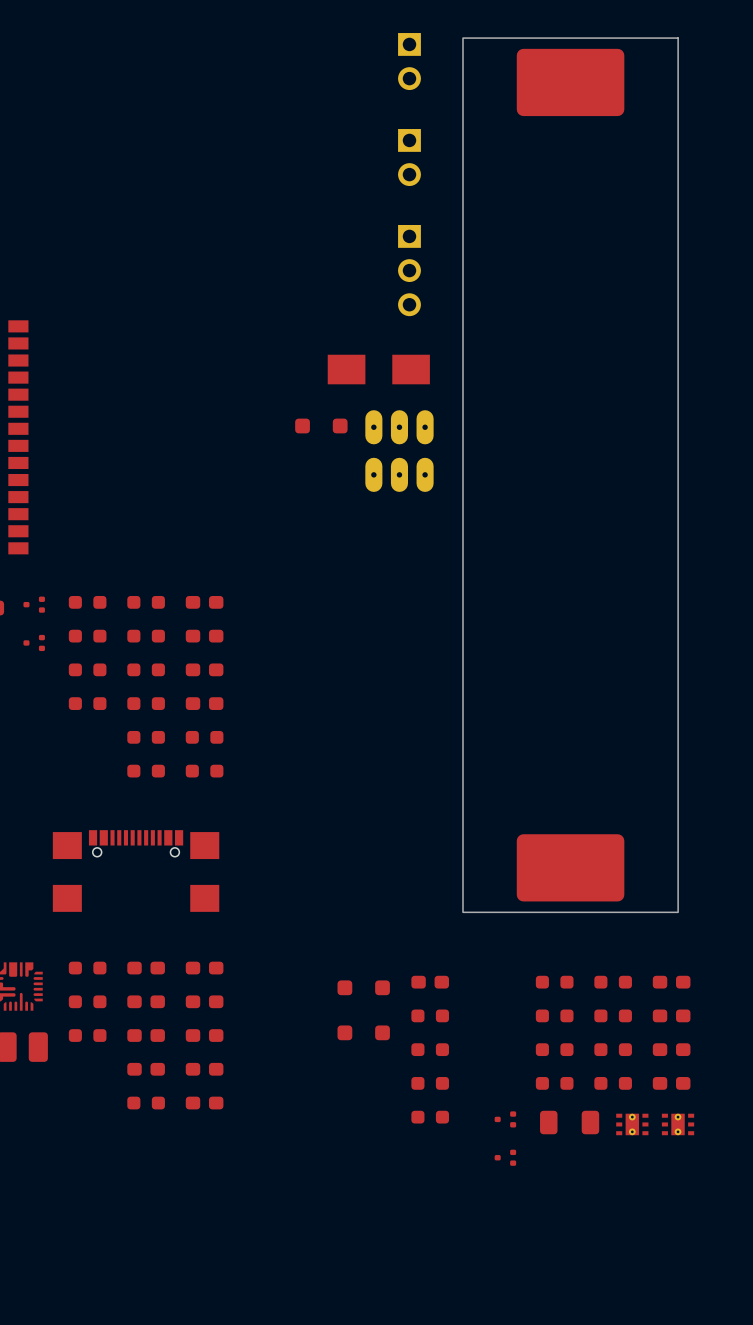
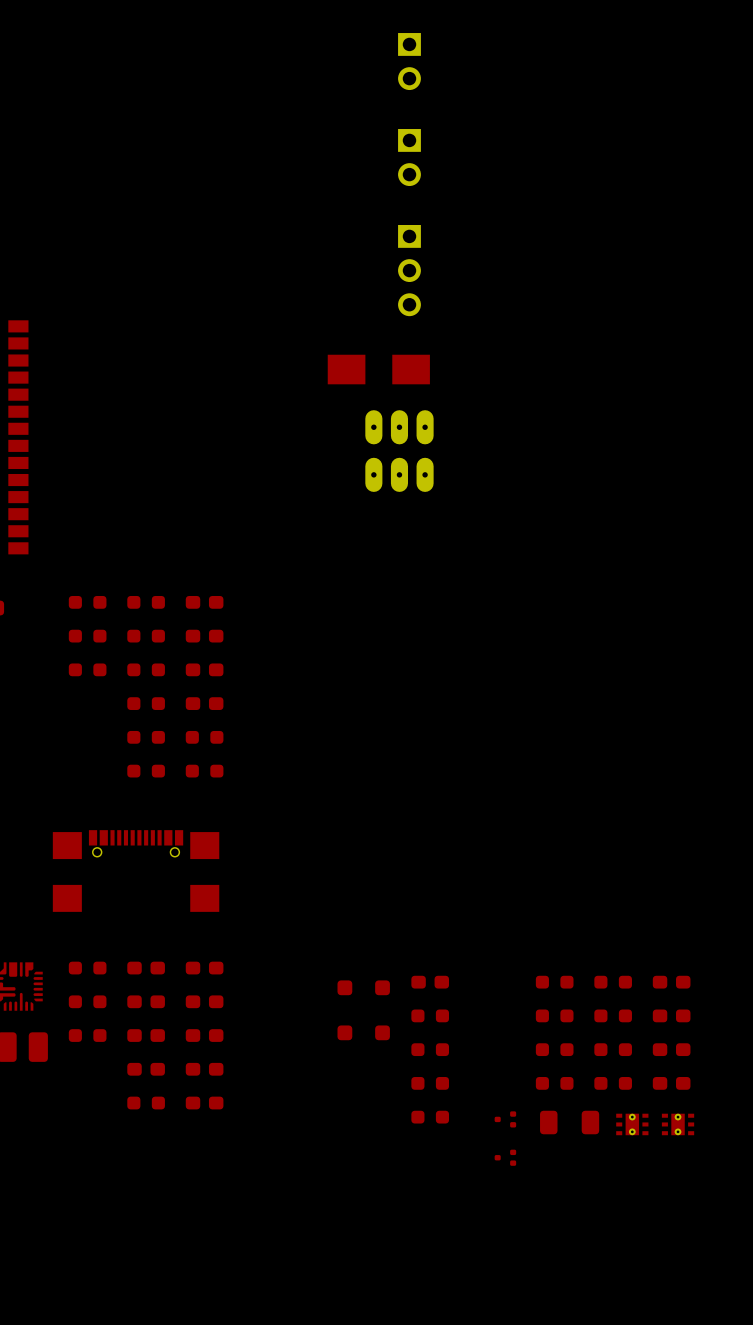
part: (321, 425) -> none
part: (570, 475) -> none
part: (34, 604) -> none
part: (34, 642) -> none
part: (87, 703) -> none

